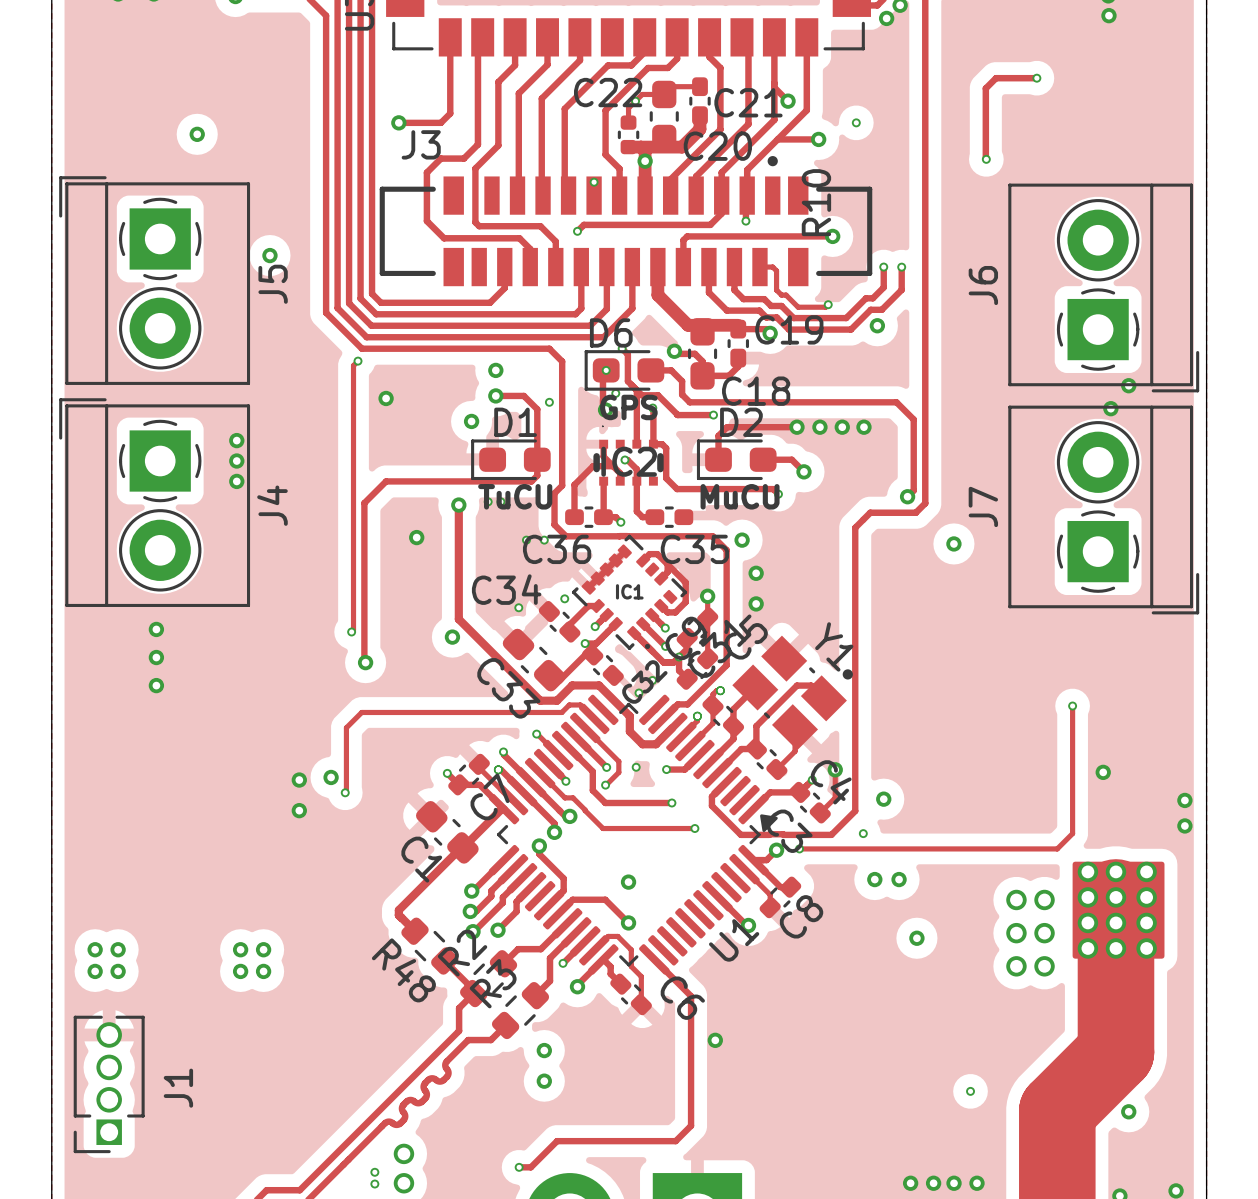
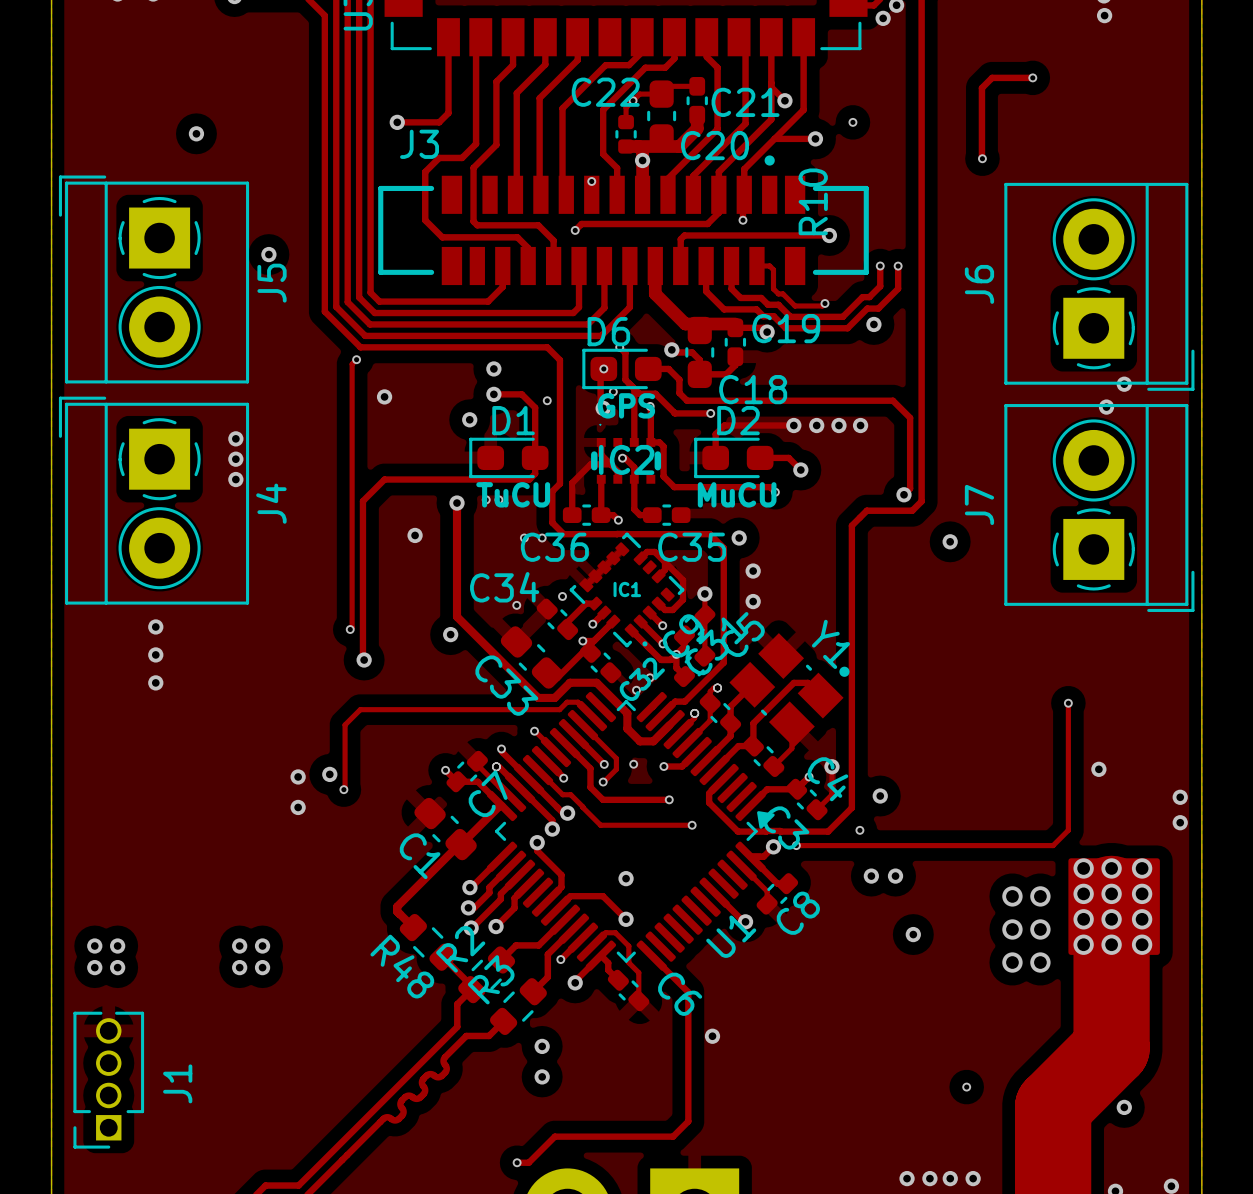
via: (403, 1153) -> none
via: (374, 1172) -> none
via: (403, 1183) -> none
via: (374, 1184) -> none

